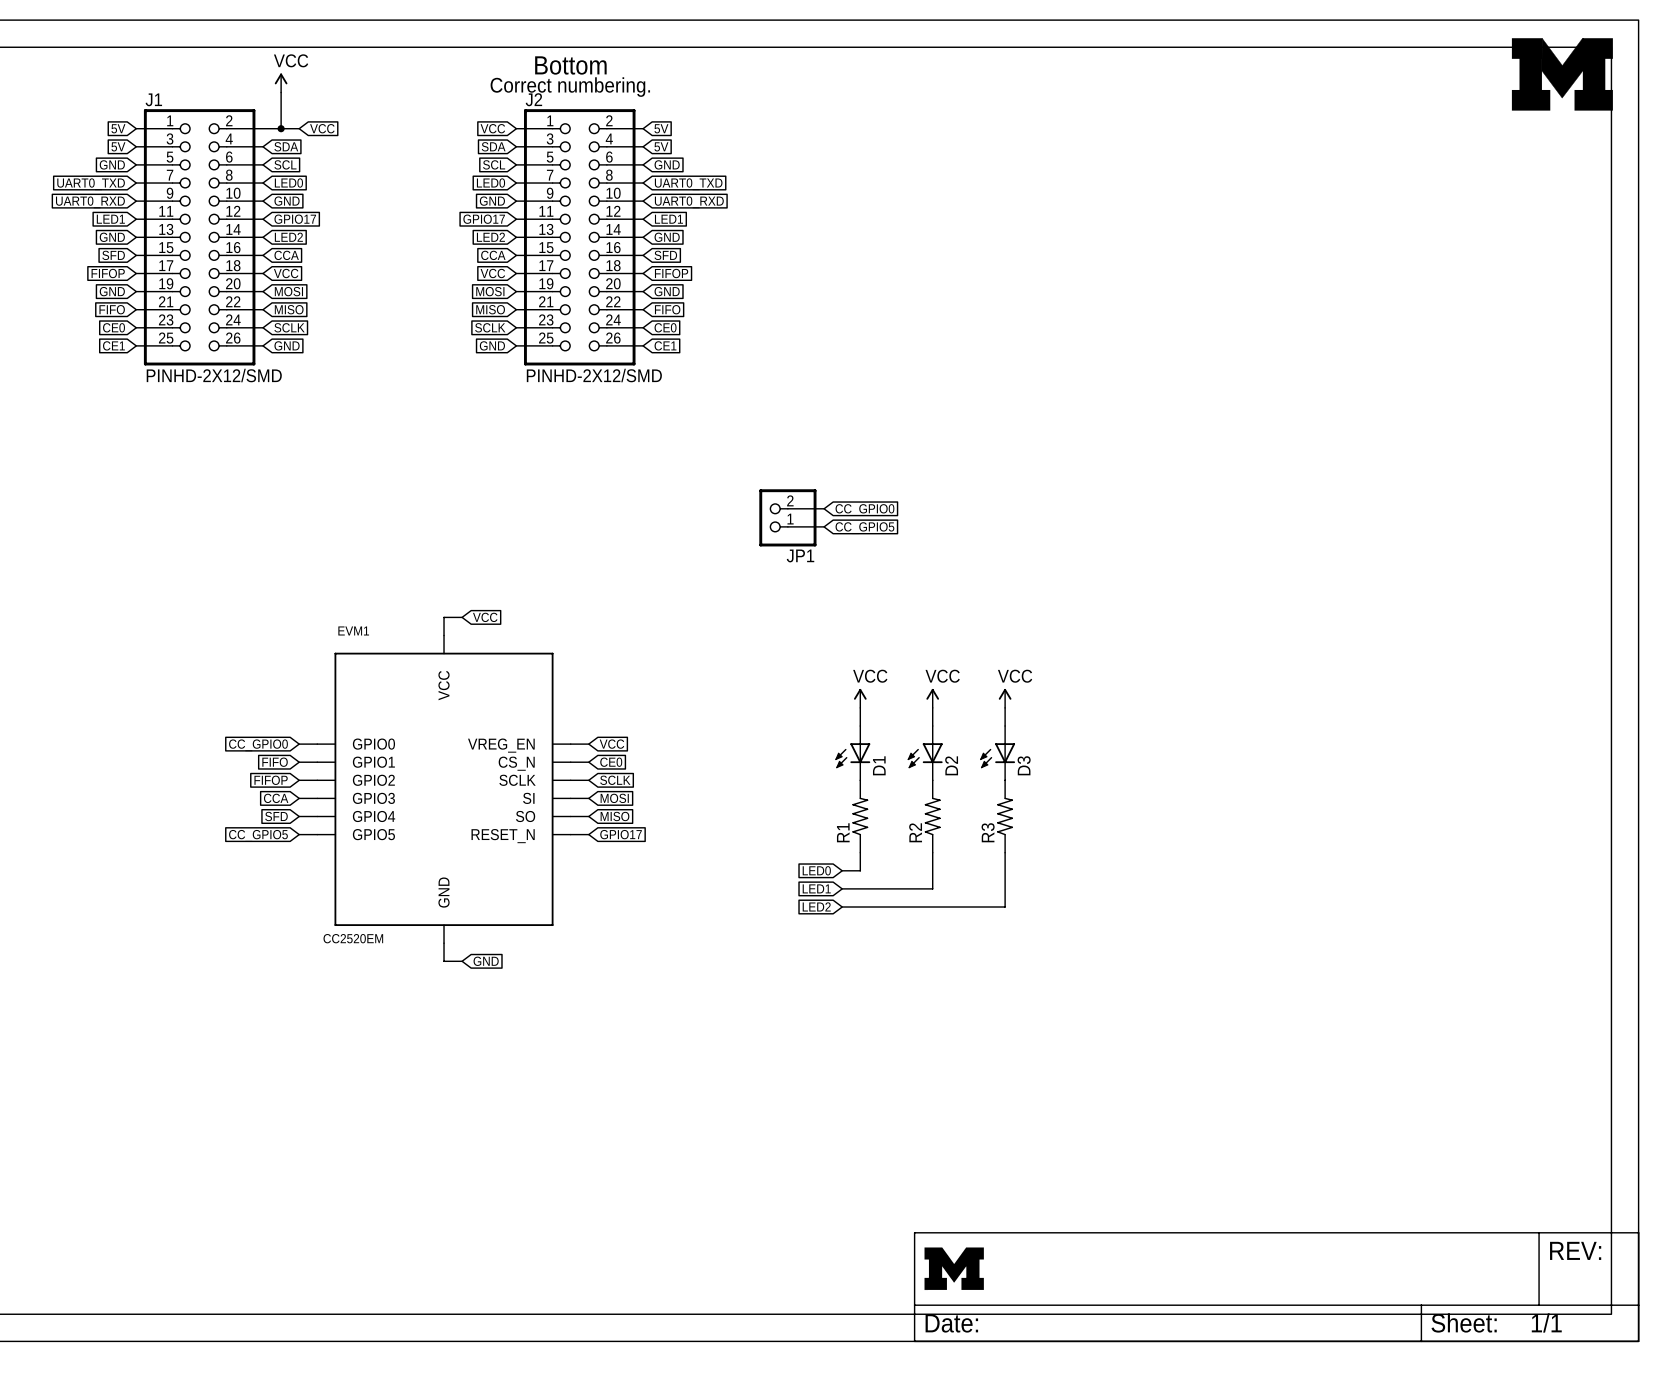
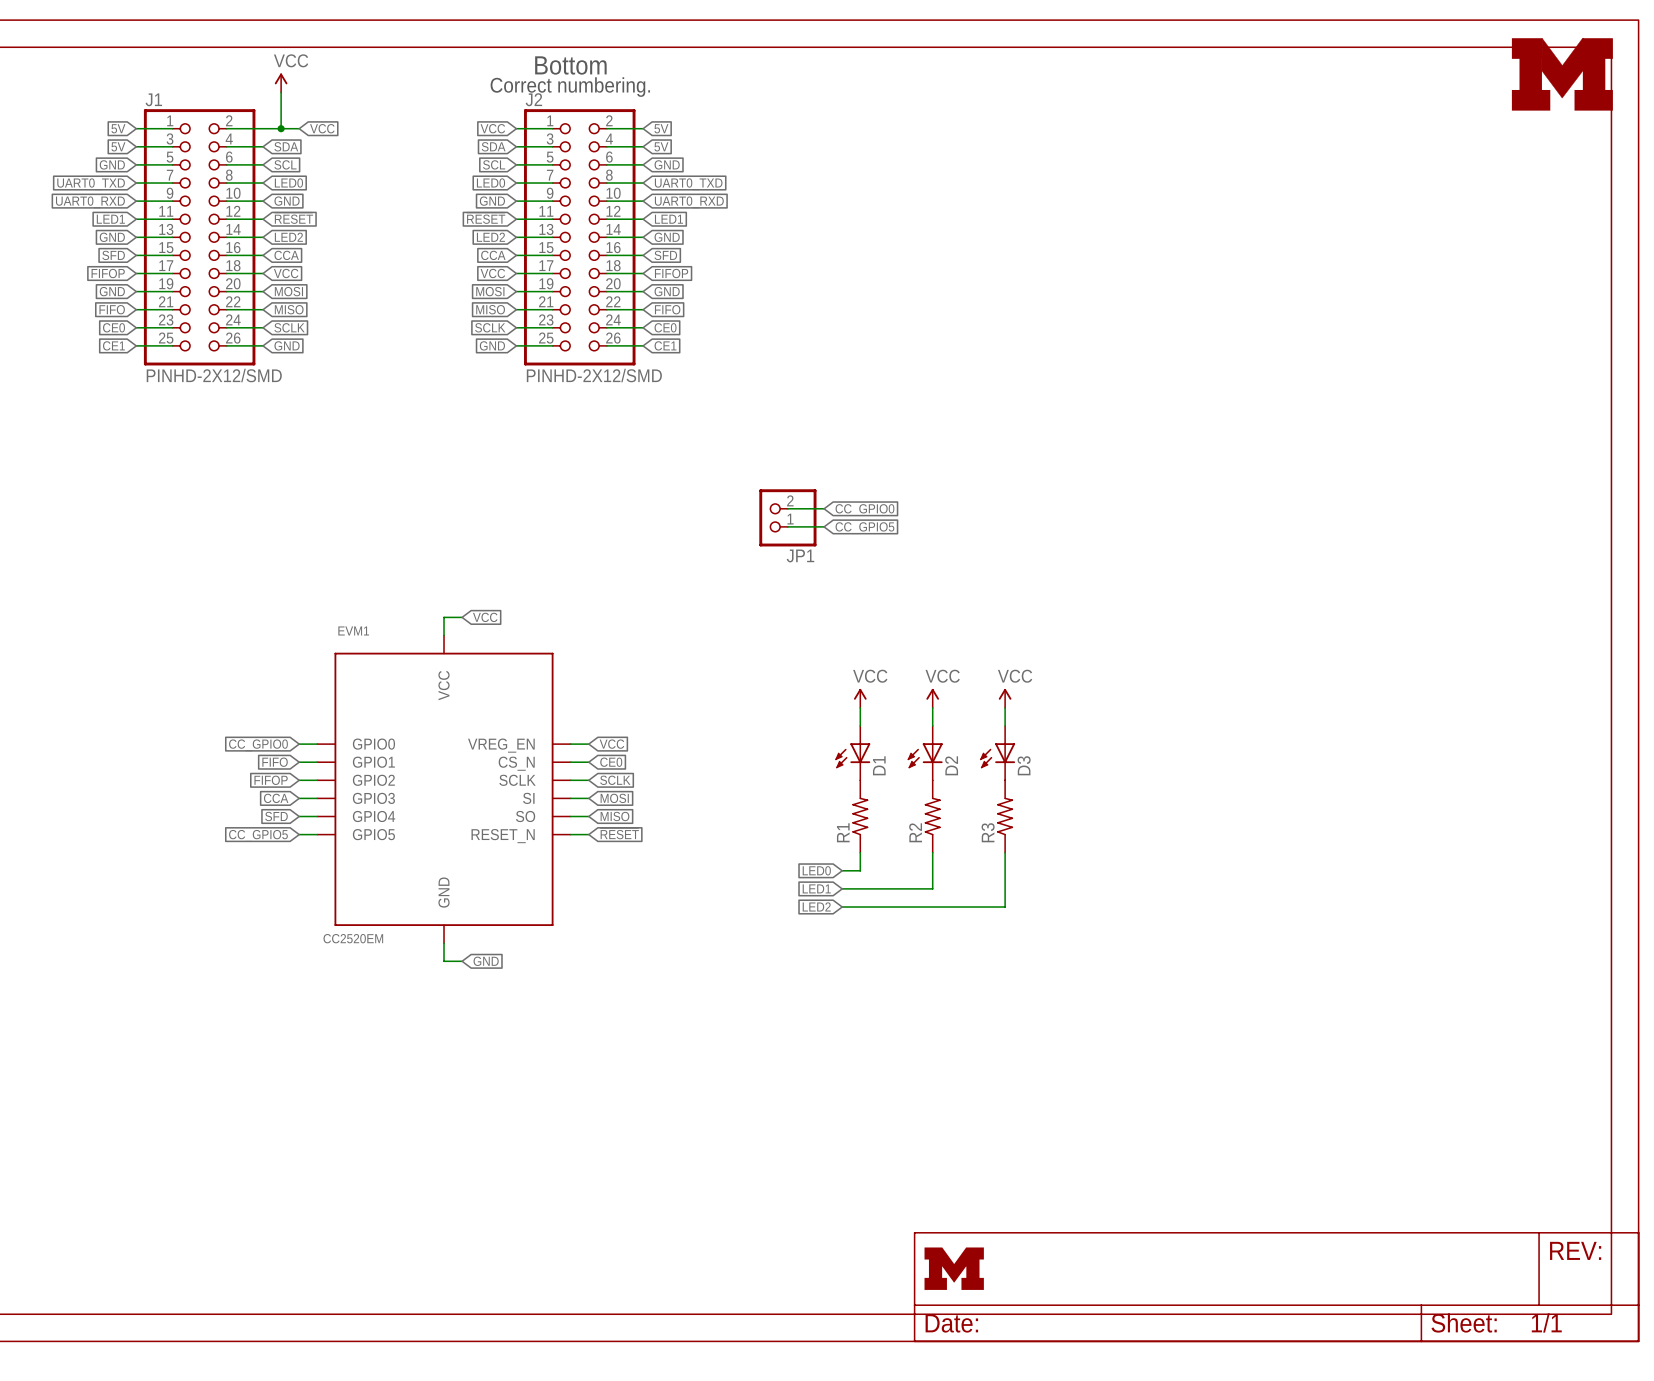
global label: GPIO17 (295, 219) -> ~{RESET} (293, 218)
global label: GPIO17 (484, 219) -> ~{RESET} (486, 218)
global label: GPIO17 (621, 834) -> ~{RESET} (619, 833)

